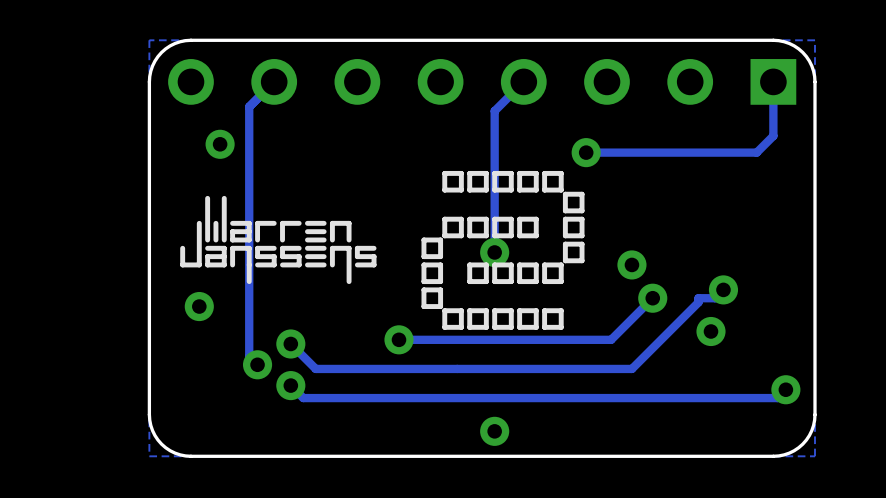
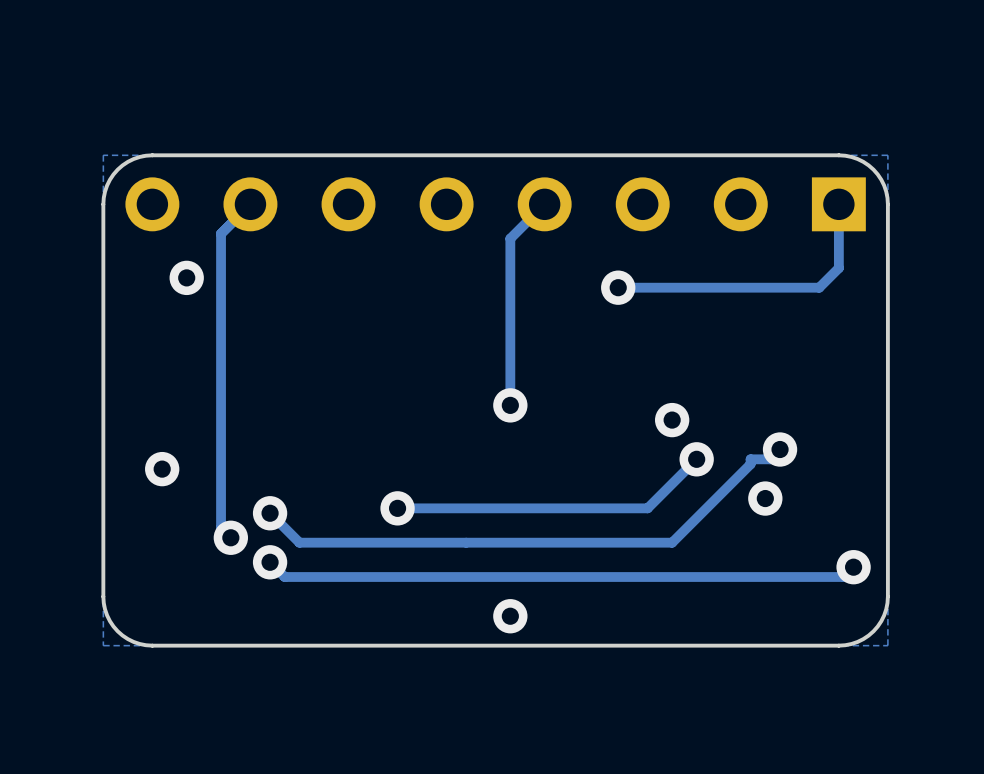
drawing: [421, 170, 585, 330] -> none
drawing: [180, 195, 377, 285] -> none

